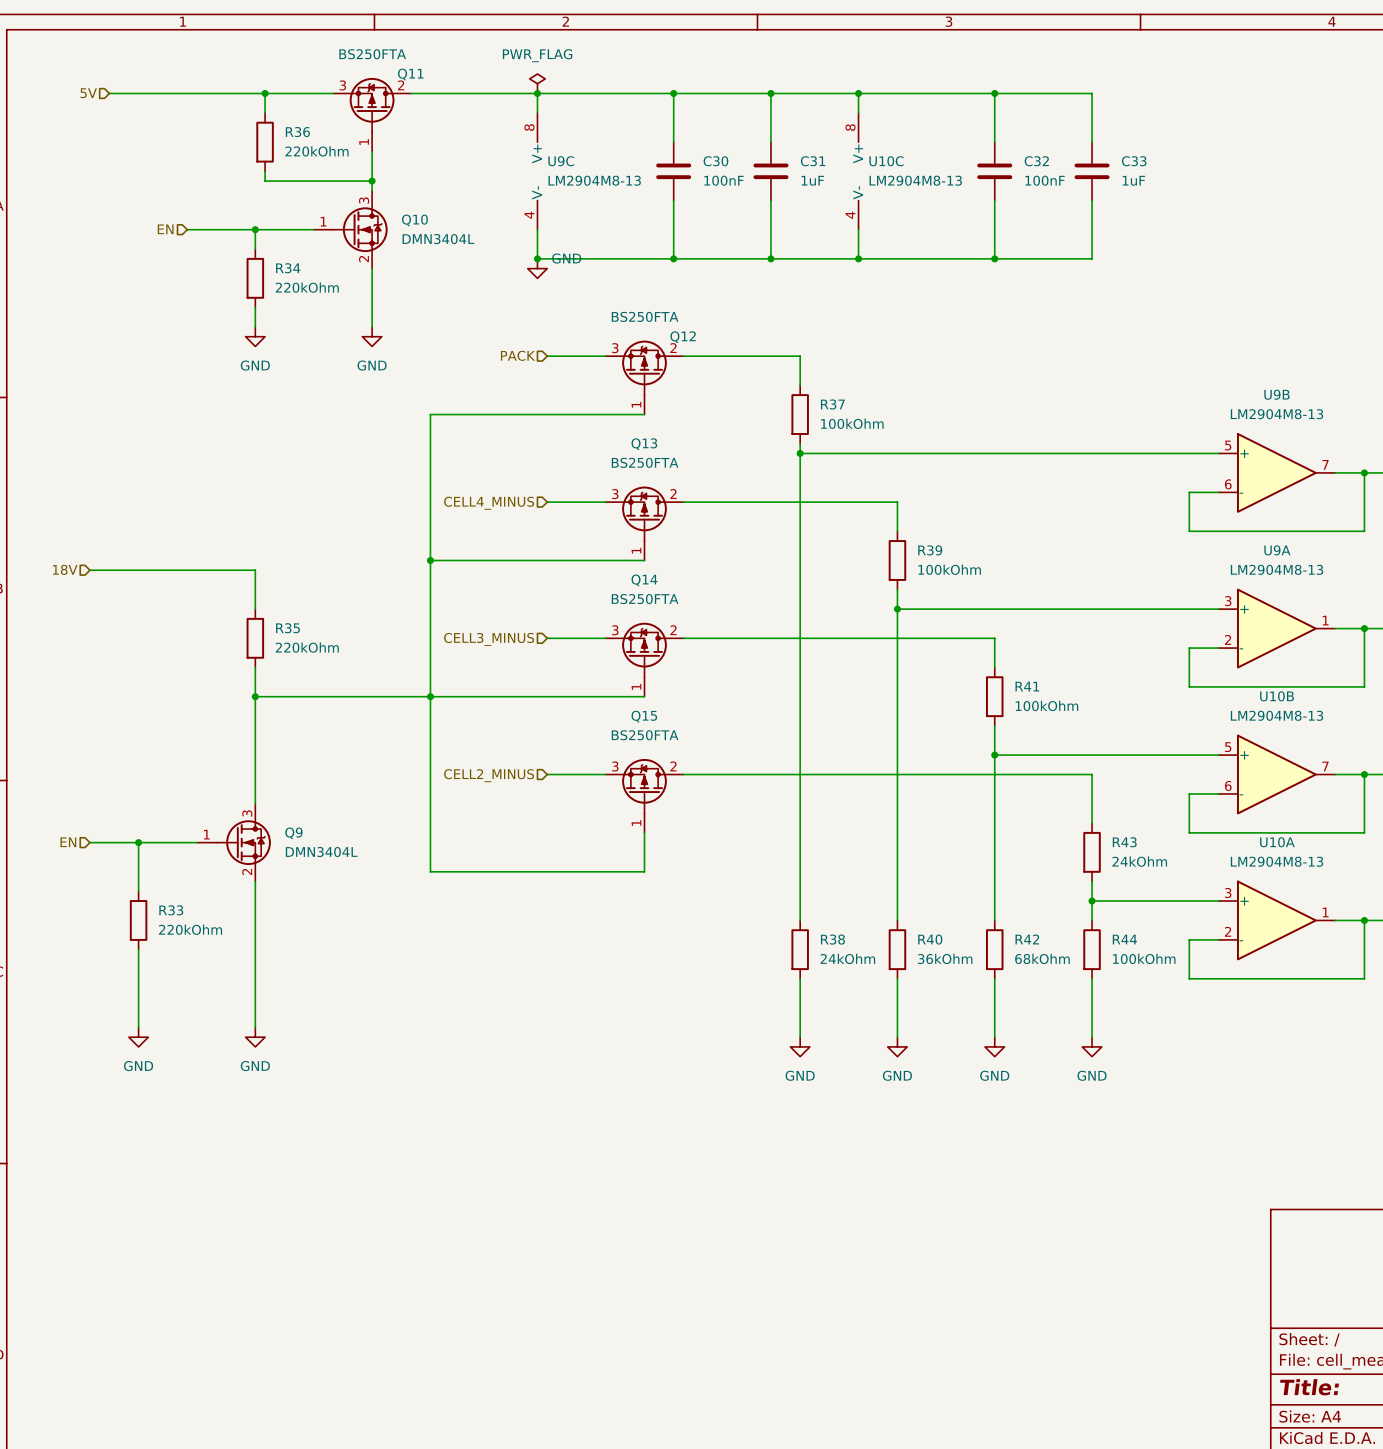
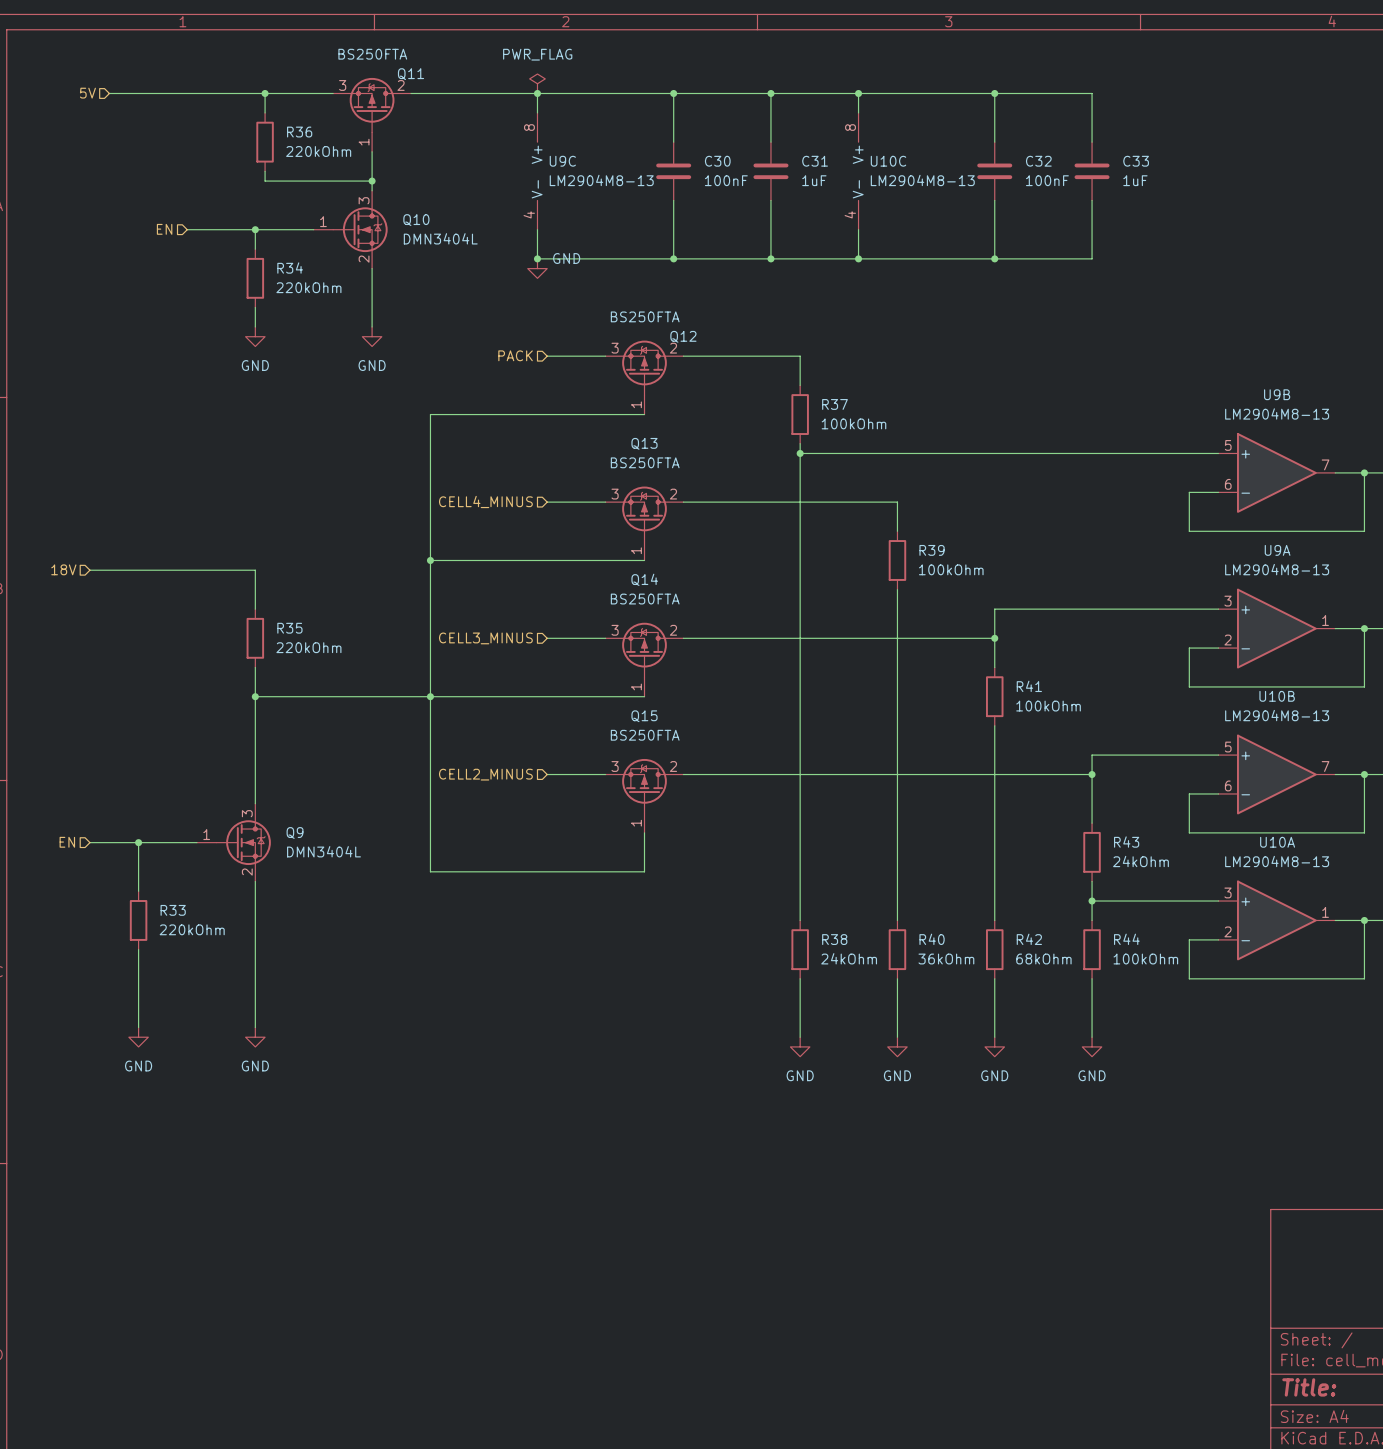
wire: (897, 609) (994, 609) -> (994, 638) (994, 609)
junction: (897, 609) -> none
junction: none -> (994, 638)
wire: (994, 755) (1092, 755) -> (1092, 774) (1092, 755)
junction: (994, 755) -> none
junction: none -> (1092, 774)

